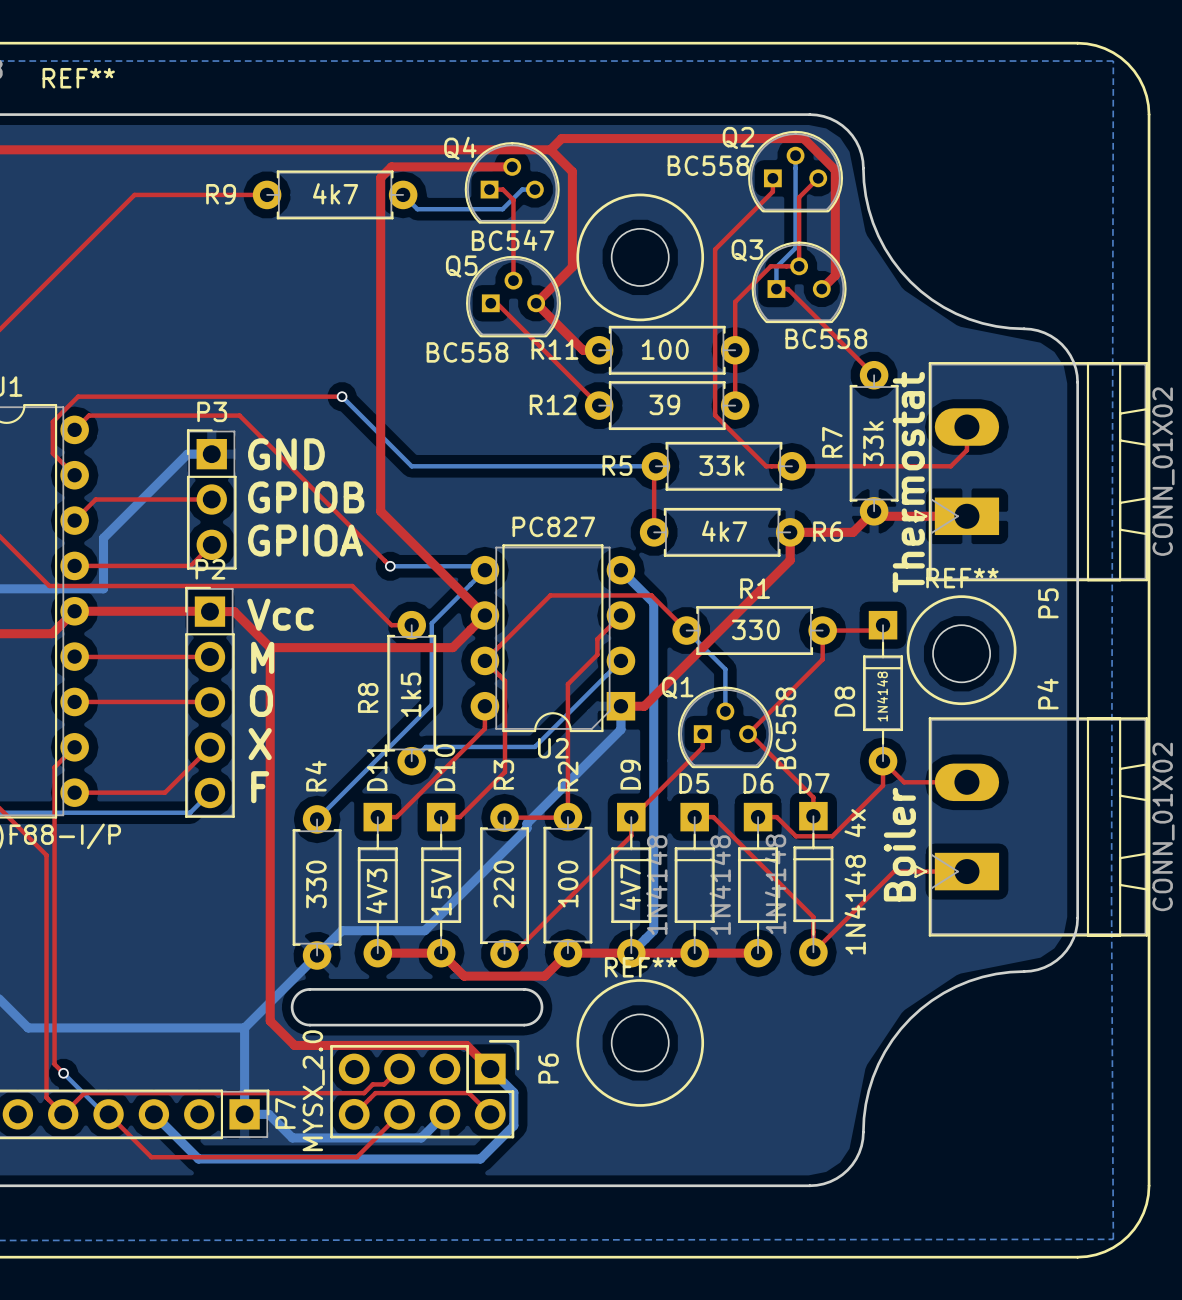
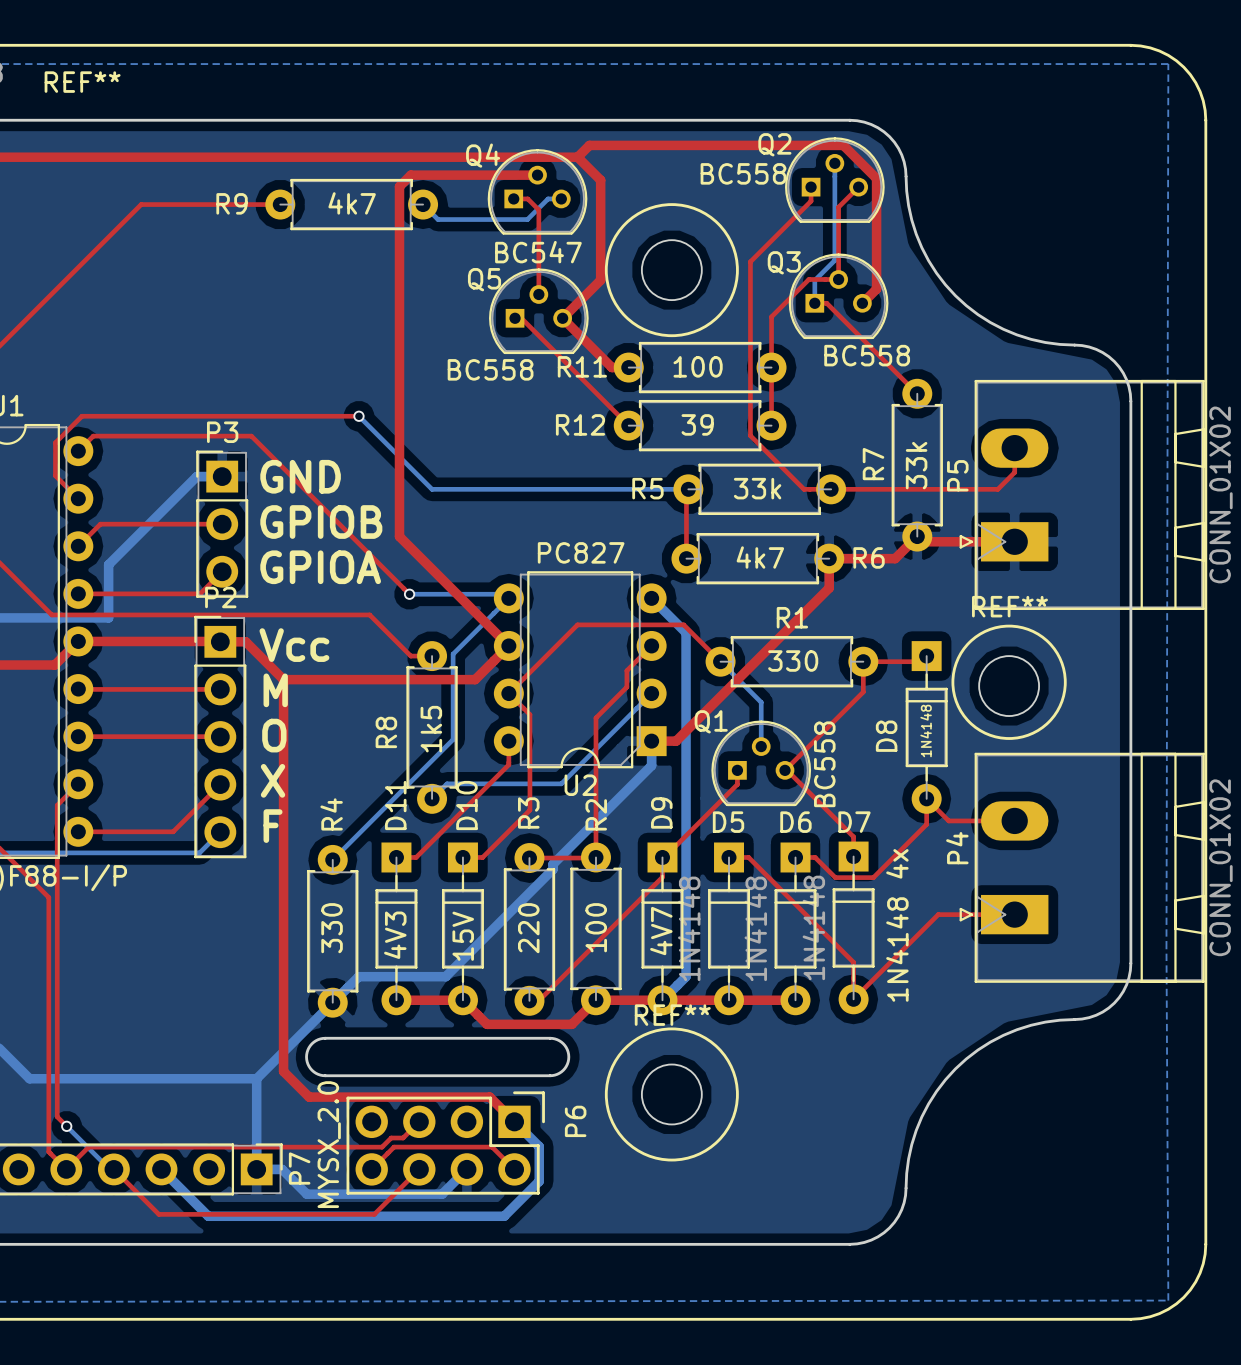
text: Thermostat (908, 482) -> none
P5 name position: P5 (1048, 603) -> P5 (957, 475)
P4 name position: P4 (1047, 693) -> P4 (957, 848)
text: Boiler (899, 844) -> none

